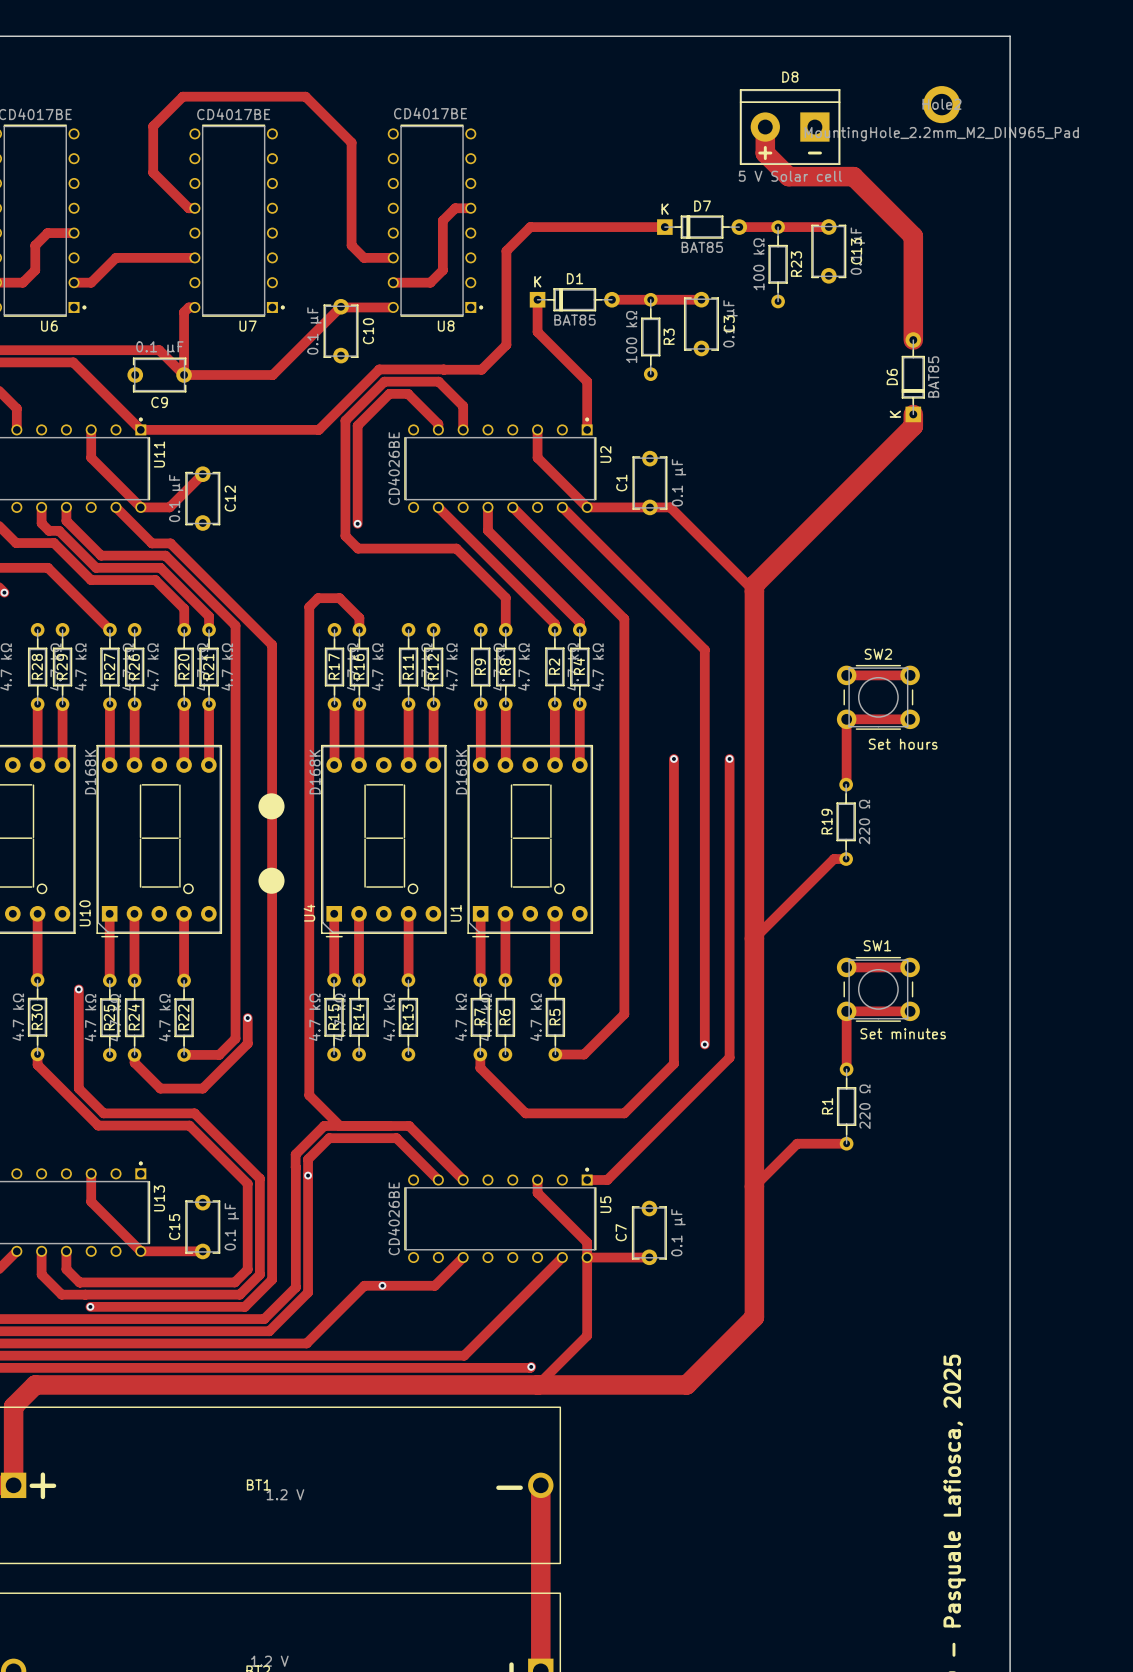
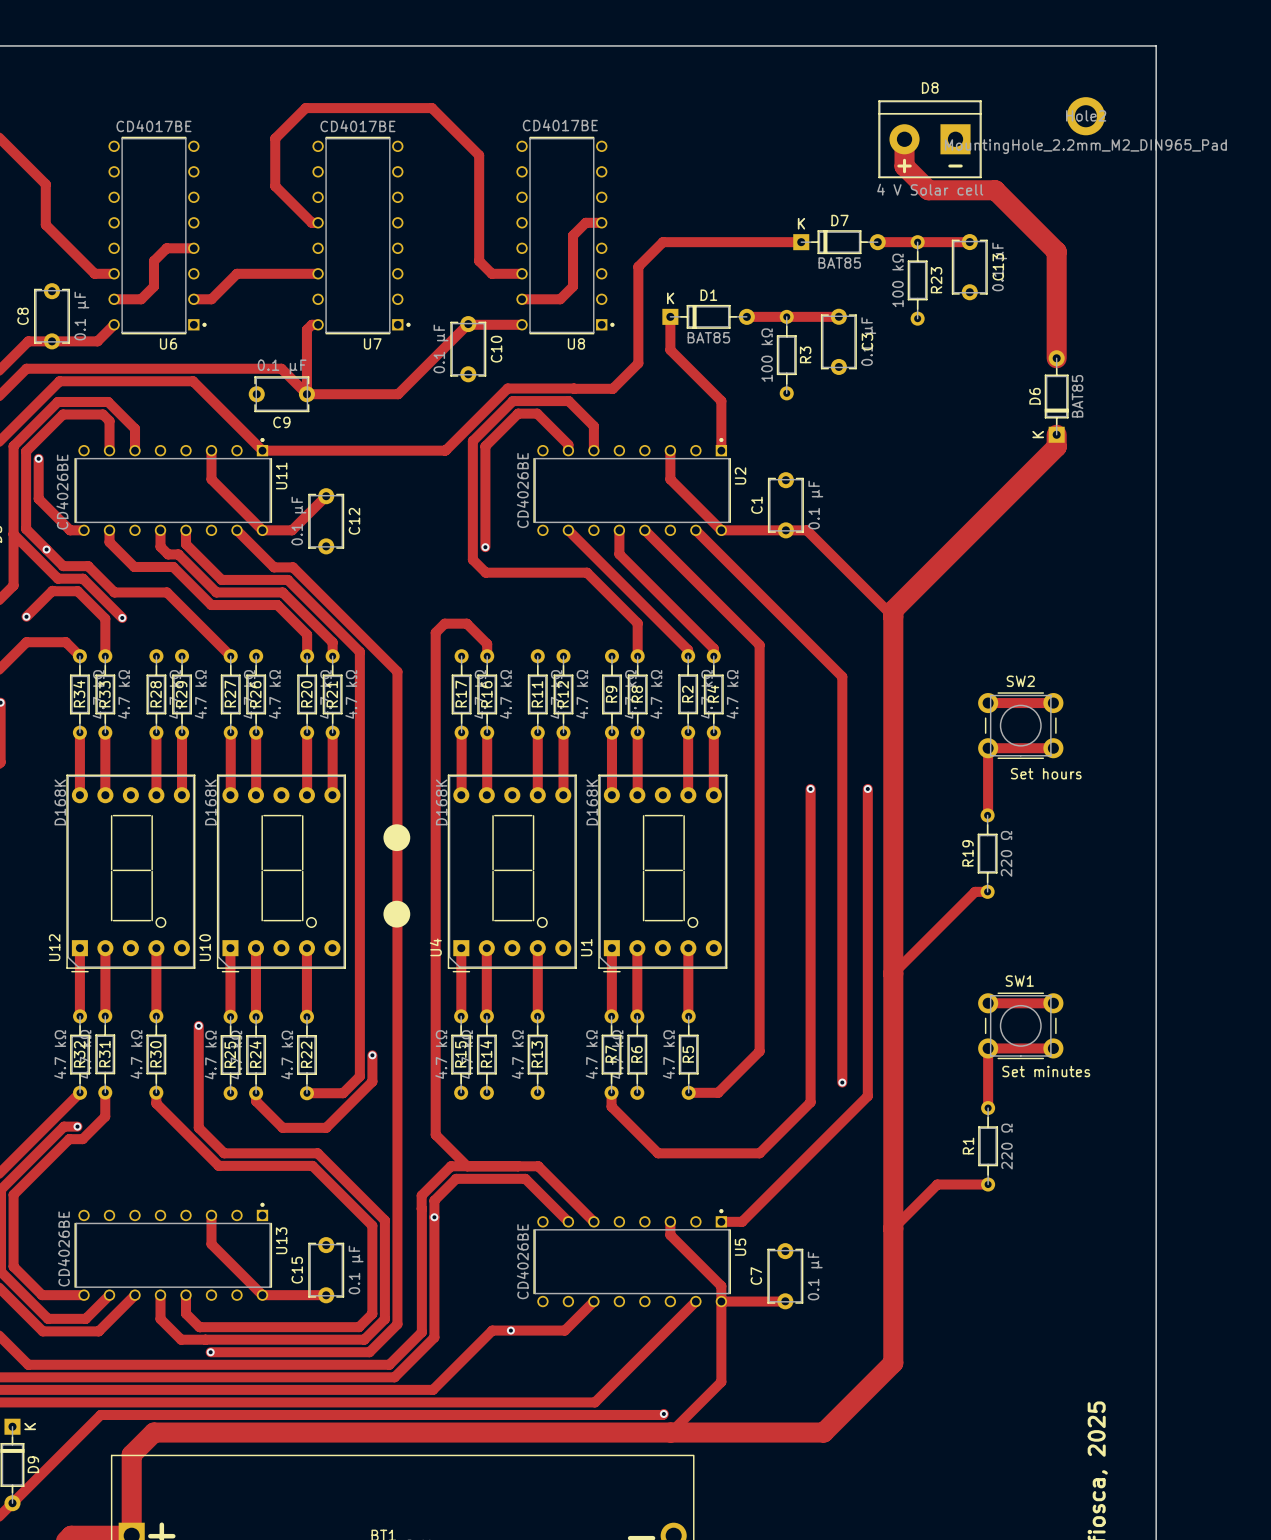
D8 value: 5 V Solar cell (790, 176) -> 4 V Solar cell (930, 189)

